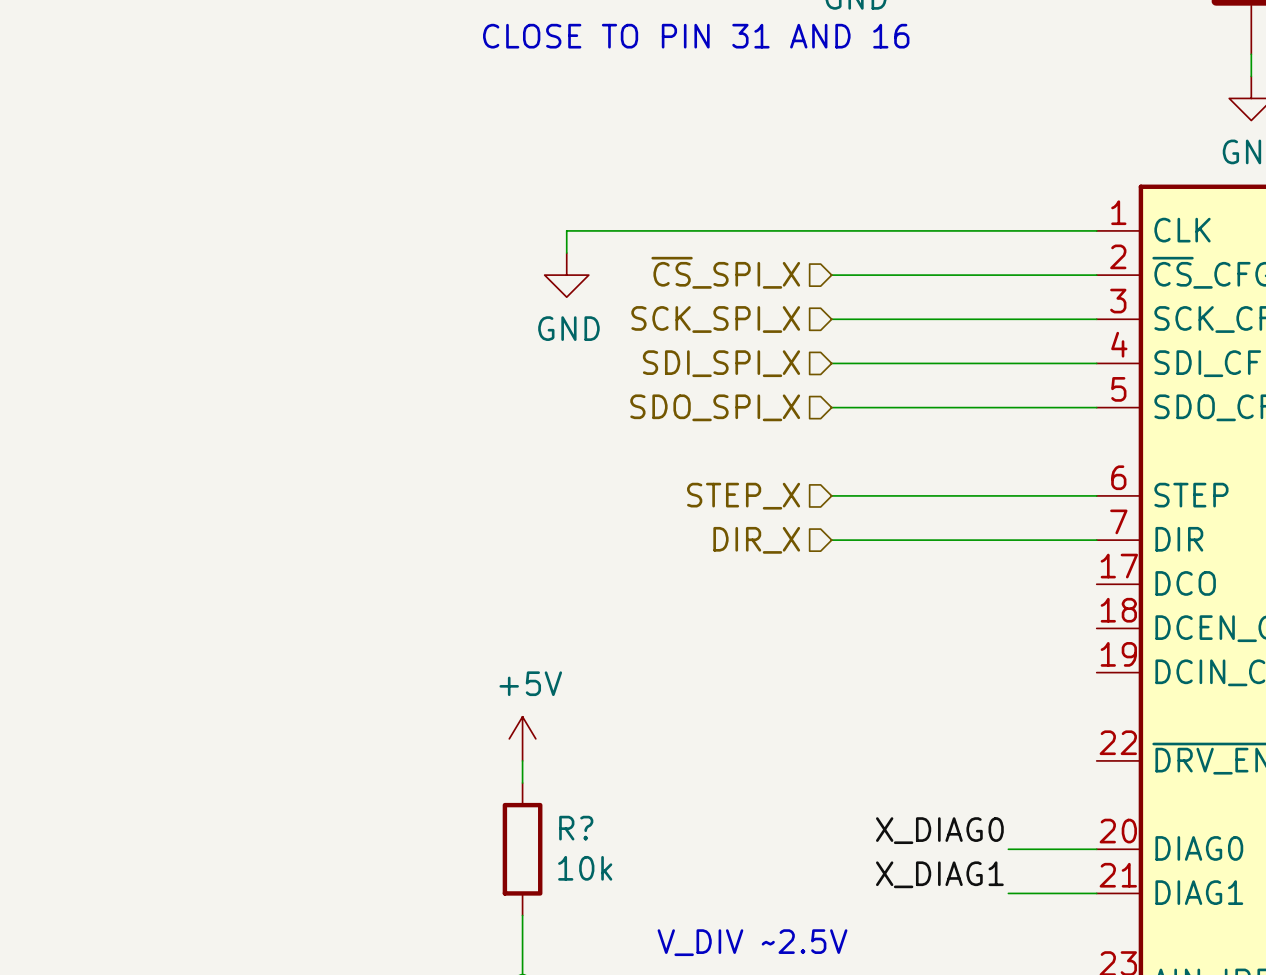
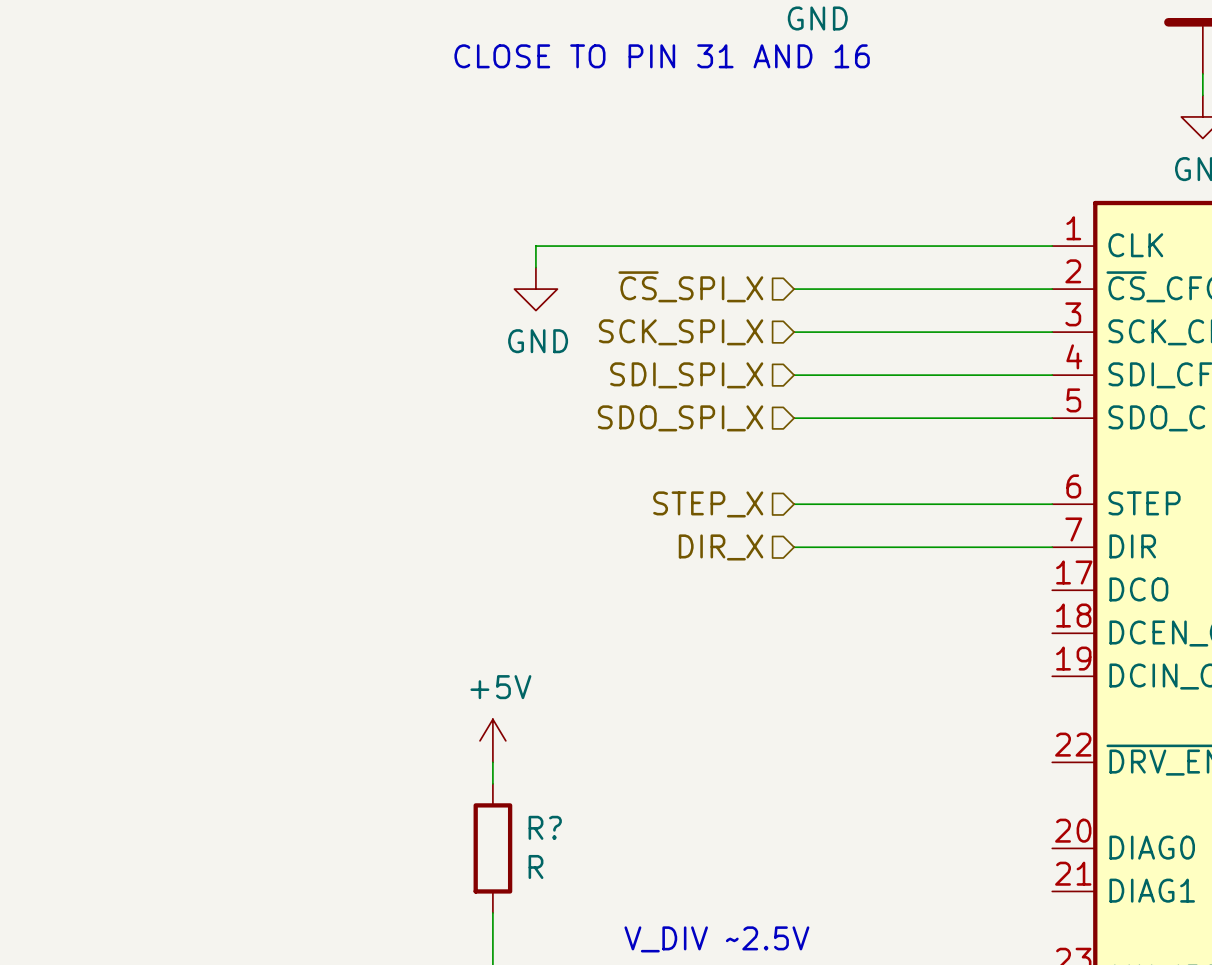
label: X_DIAG0 (939, 830) -> none
wire: (1008, 849) (1096, 849) -> none
R? value: 10k (585, 868) -> R (536, 866)
label: X_DIAG1 (939, 874) -> none
wire: (1008, 893) (1096, 893) -> none

